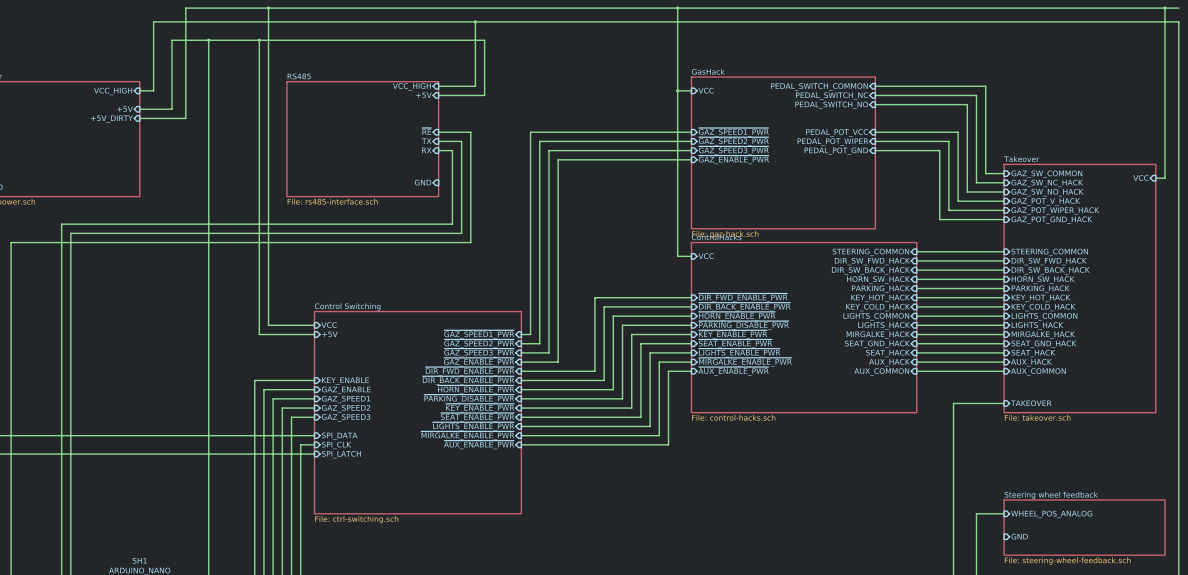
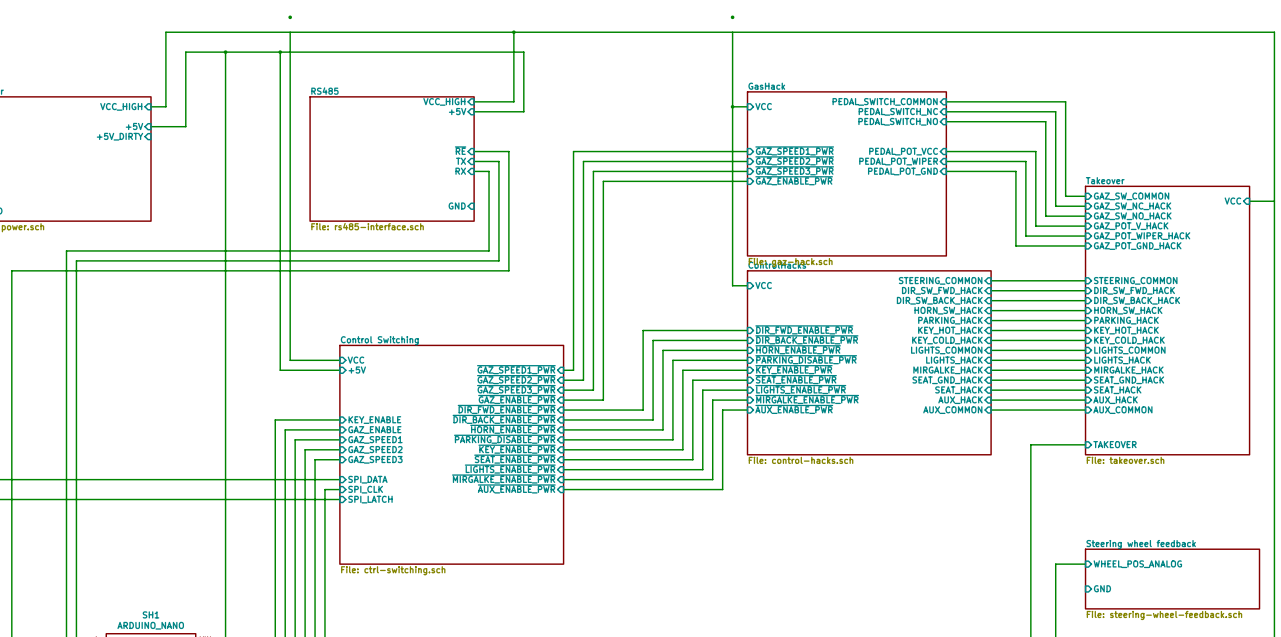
wire: (268, 8) (268, 21) -> none
wire: (677, 8) (677, 21) -> none
wire: (1164, 8) (1164, 178) -> (1274, 201) (1259, 201)
wire: (1178, 8) (185, 8) (185, 118) (139, 118) -> none

